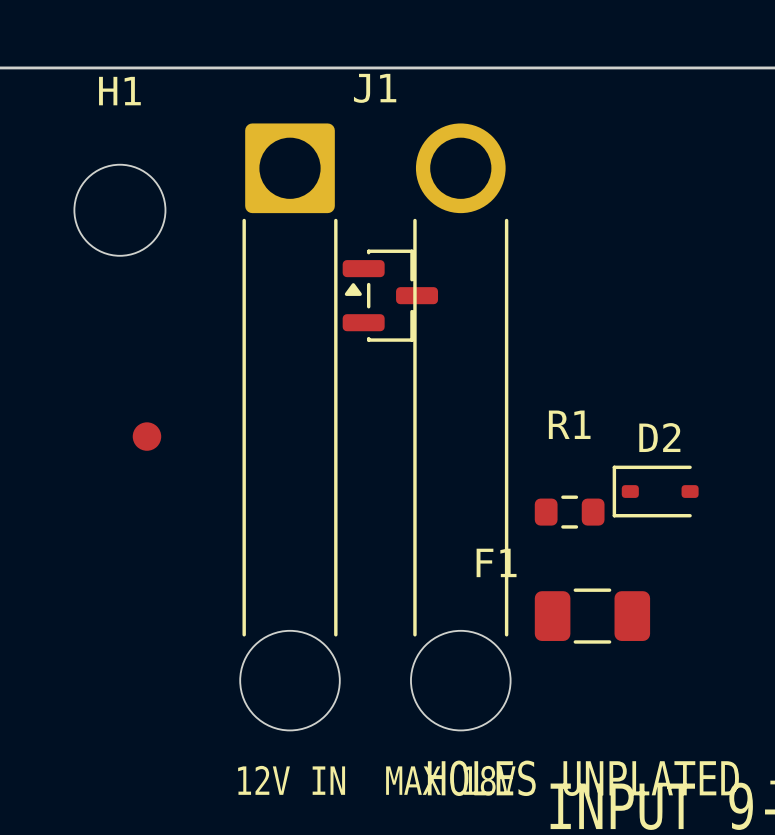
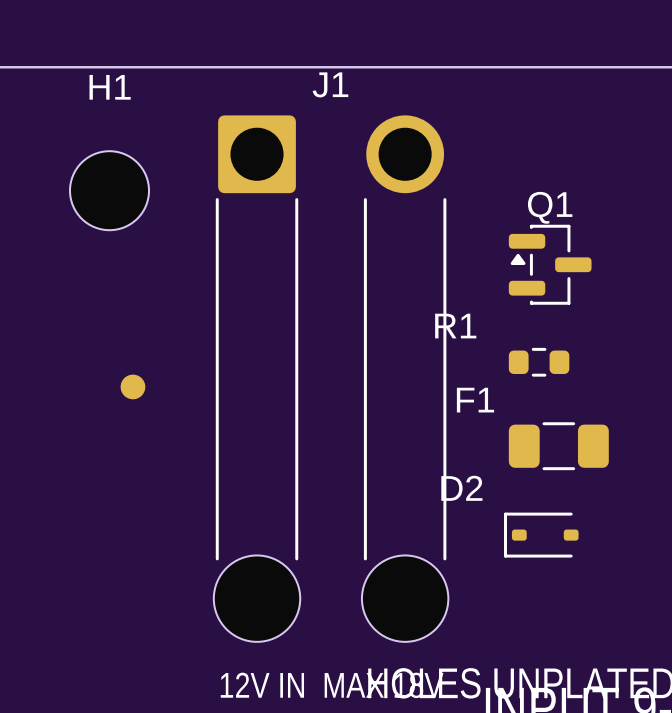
part: (390, 295) -> none
Q1: none -> (550, 264)
R1 name position: R1 (569, 424) -> R1 (455, 326)
D2 name position: D2 (659, 437) -> D2 (461, 488)
D2 position: (655, 491) -> (541, 535)
R1 position: (569, 512) -> (539, 362)
F1 position: (592, 616) -> (558, 446)

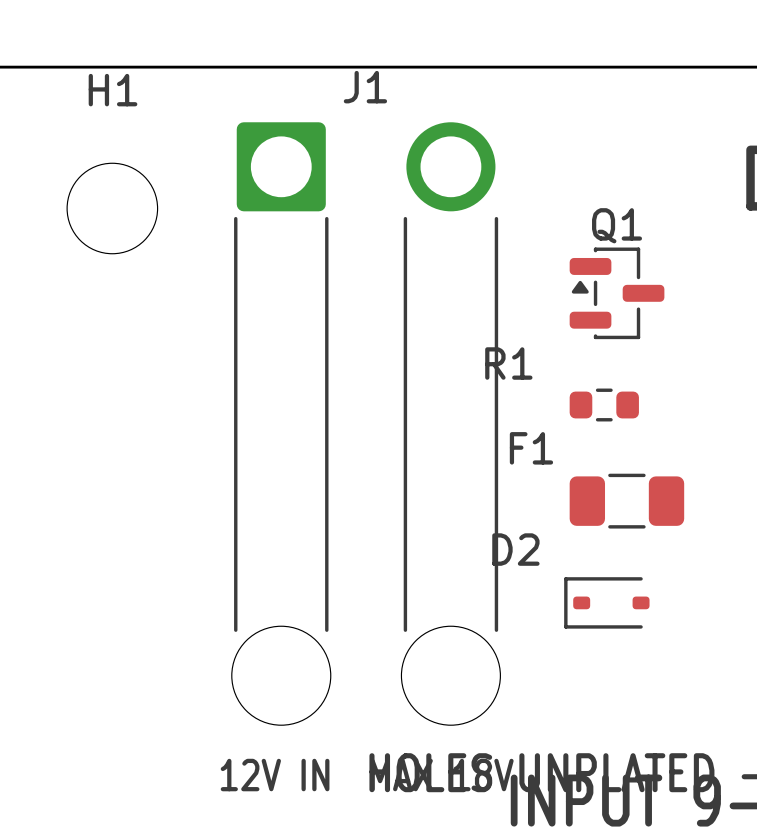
part: (132, 386) -> none

